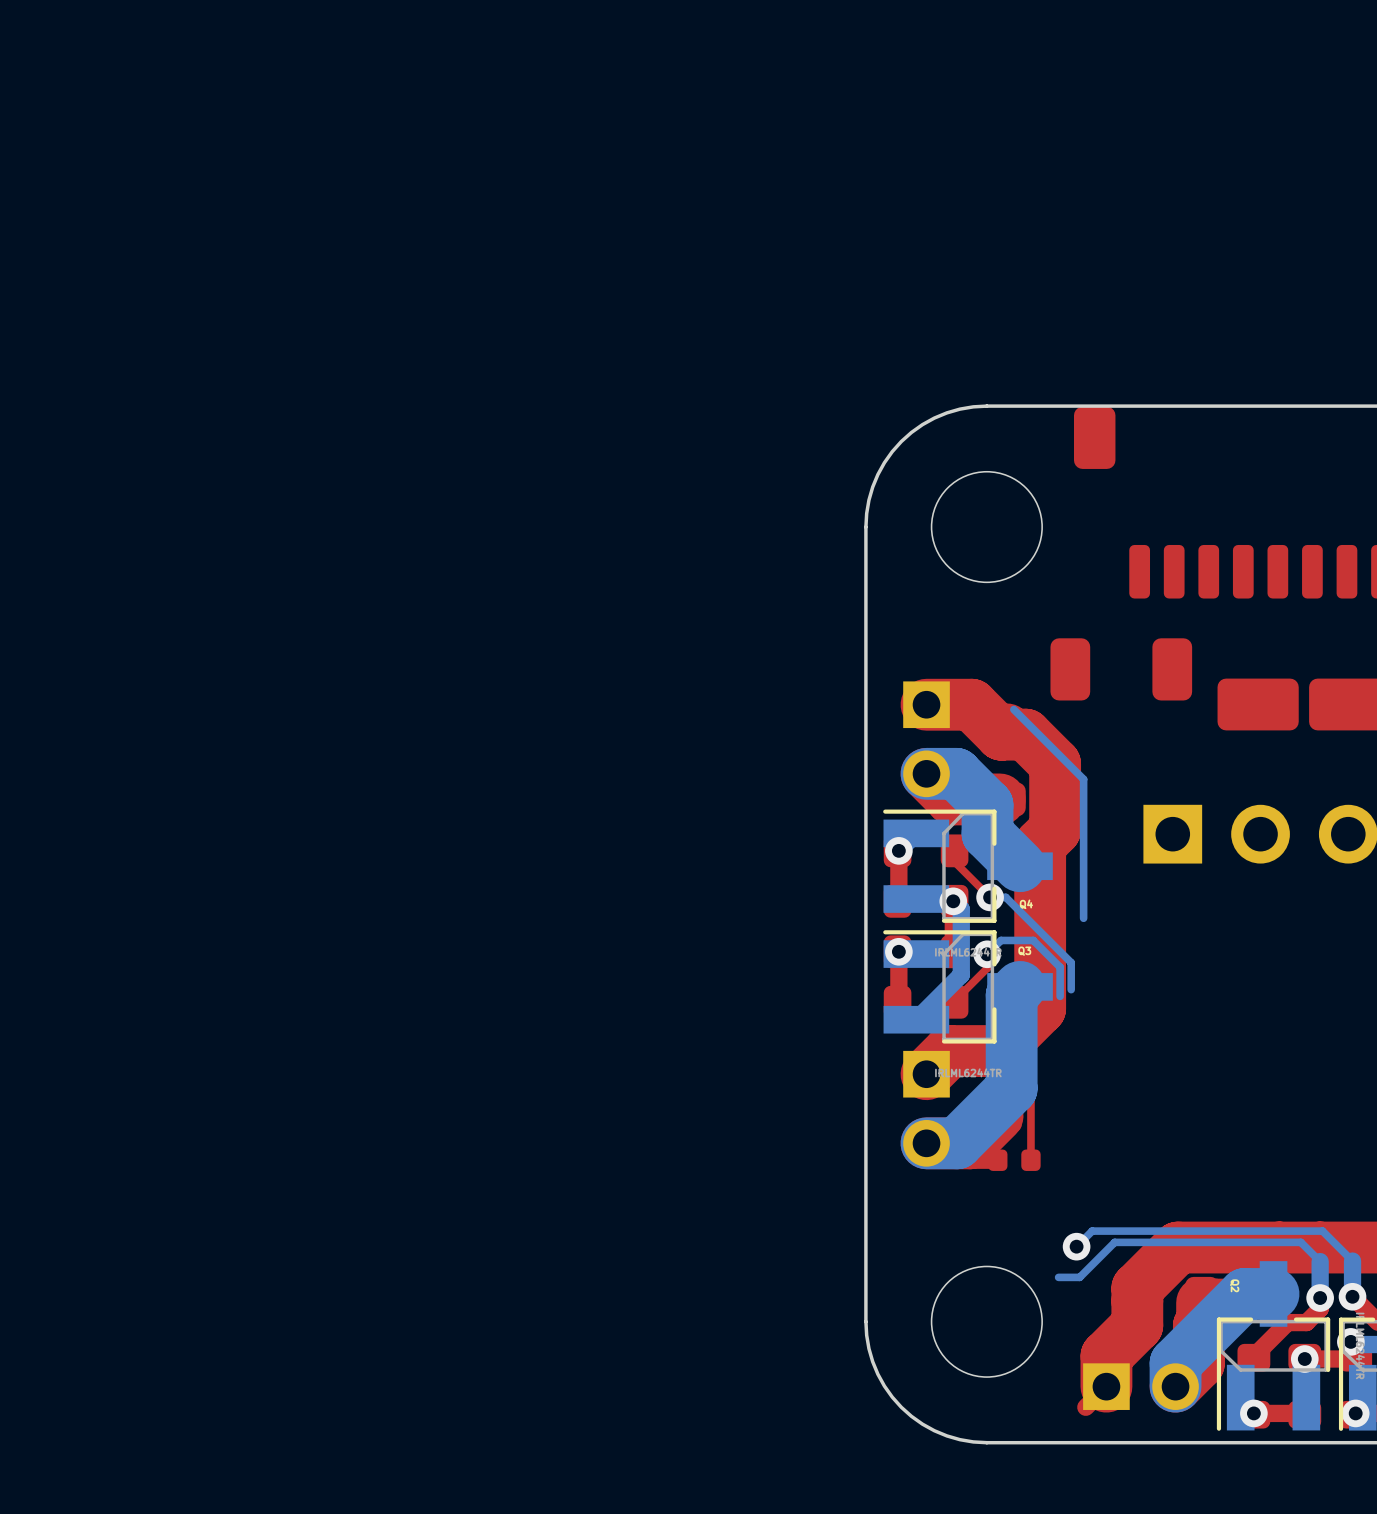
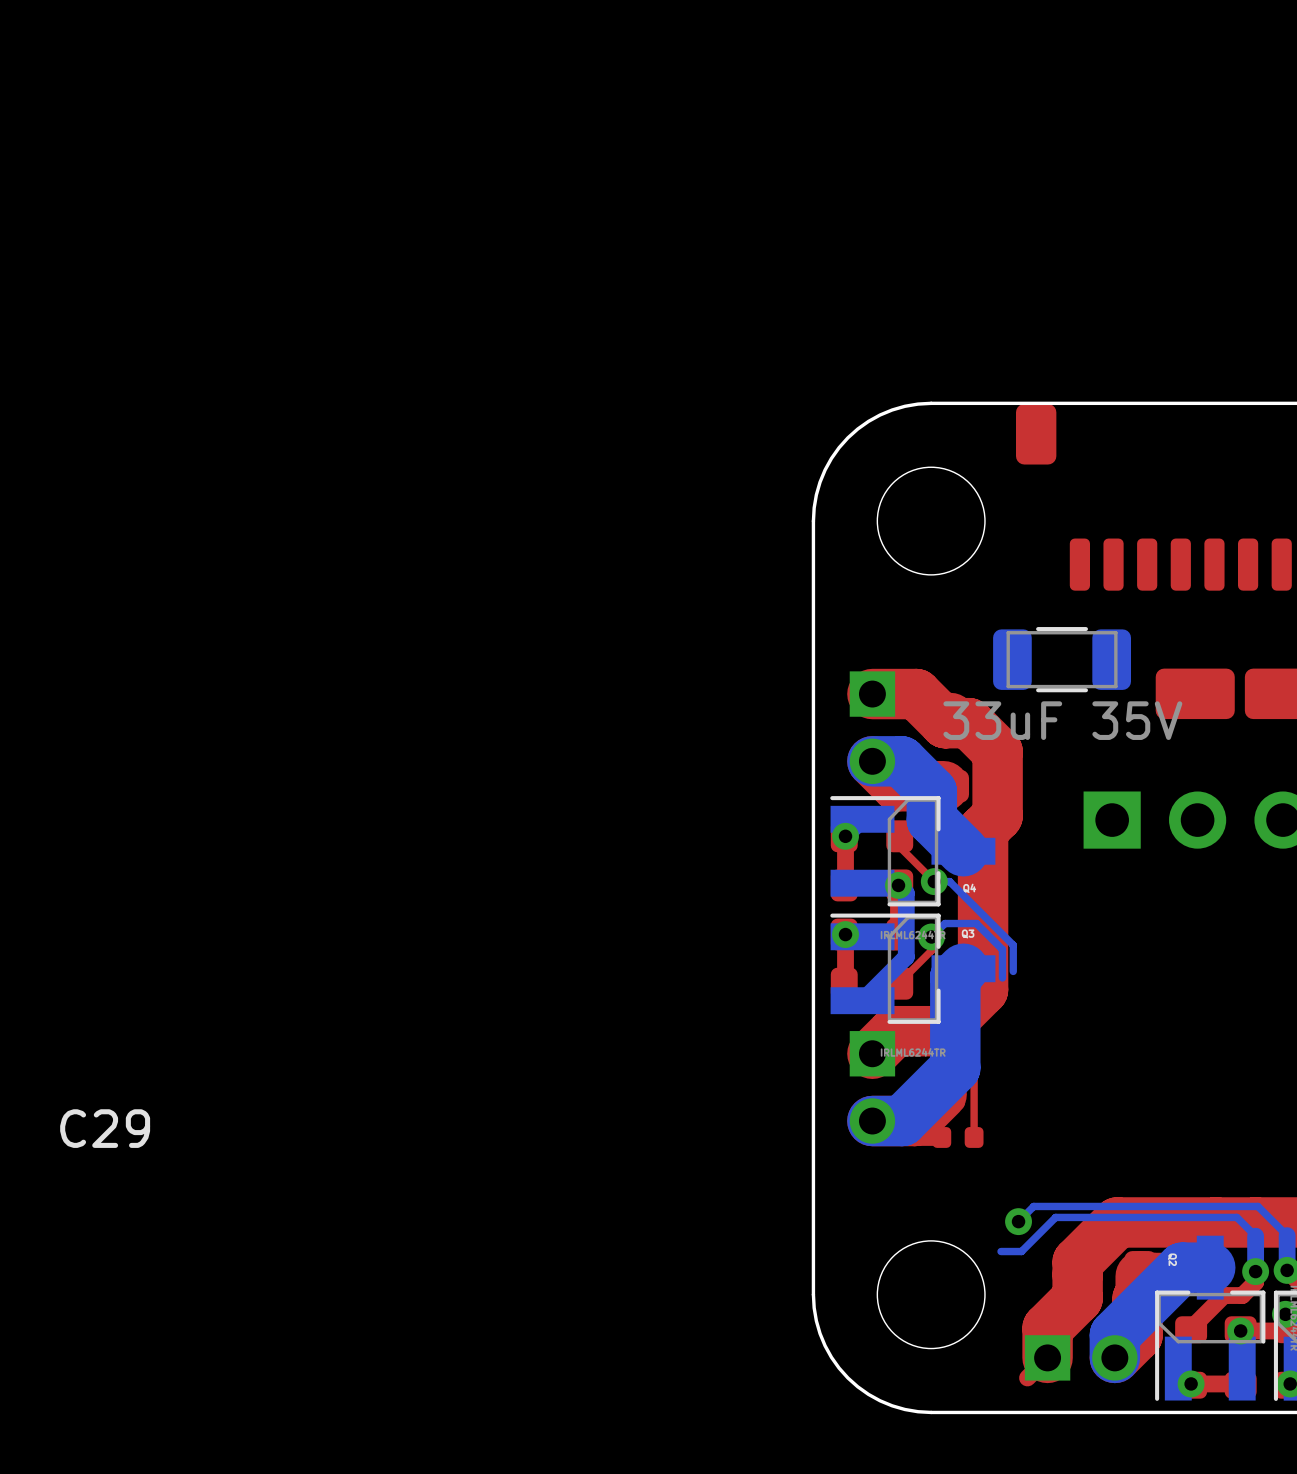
C29 side: top (1121, 669) -> bottom (1062, 659)
bottom track: (1013, 709) (1083, 779) (1083, 918) -> none

